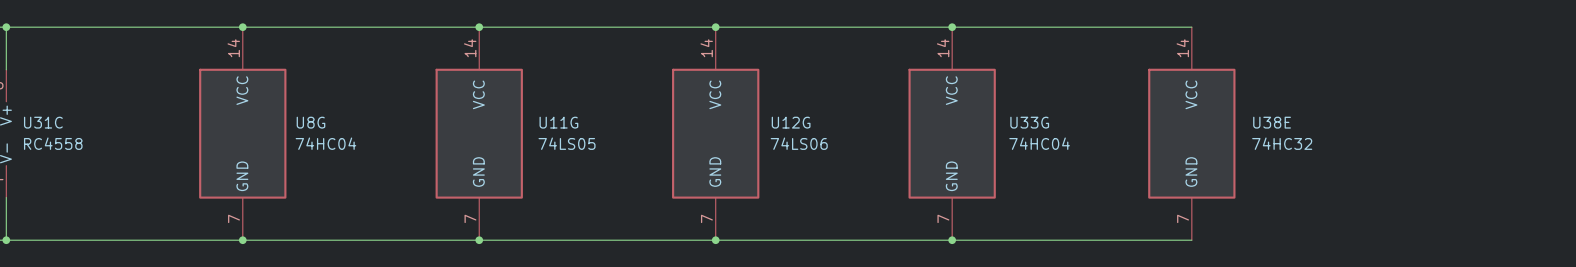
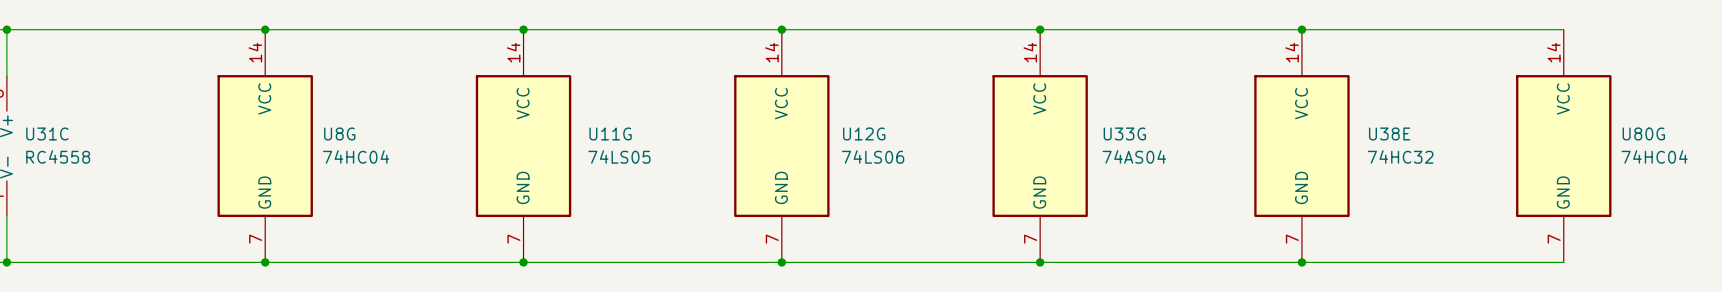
wire: none -> (1301, 29) (1563, 29)
junction: none -> (1301, 29)
U80G: none -> 74HC04 (1563, 146)
U33G value: 74HC04 (1039, 143) -> 74AS04 (1134, 156)
wire: none -> (1301, 262) (1563, 262)
junction: none -> (1301, 262)

